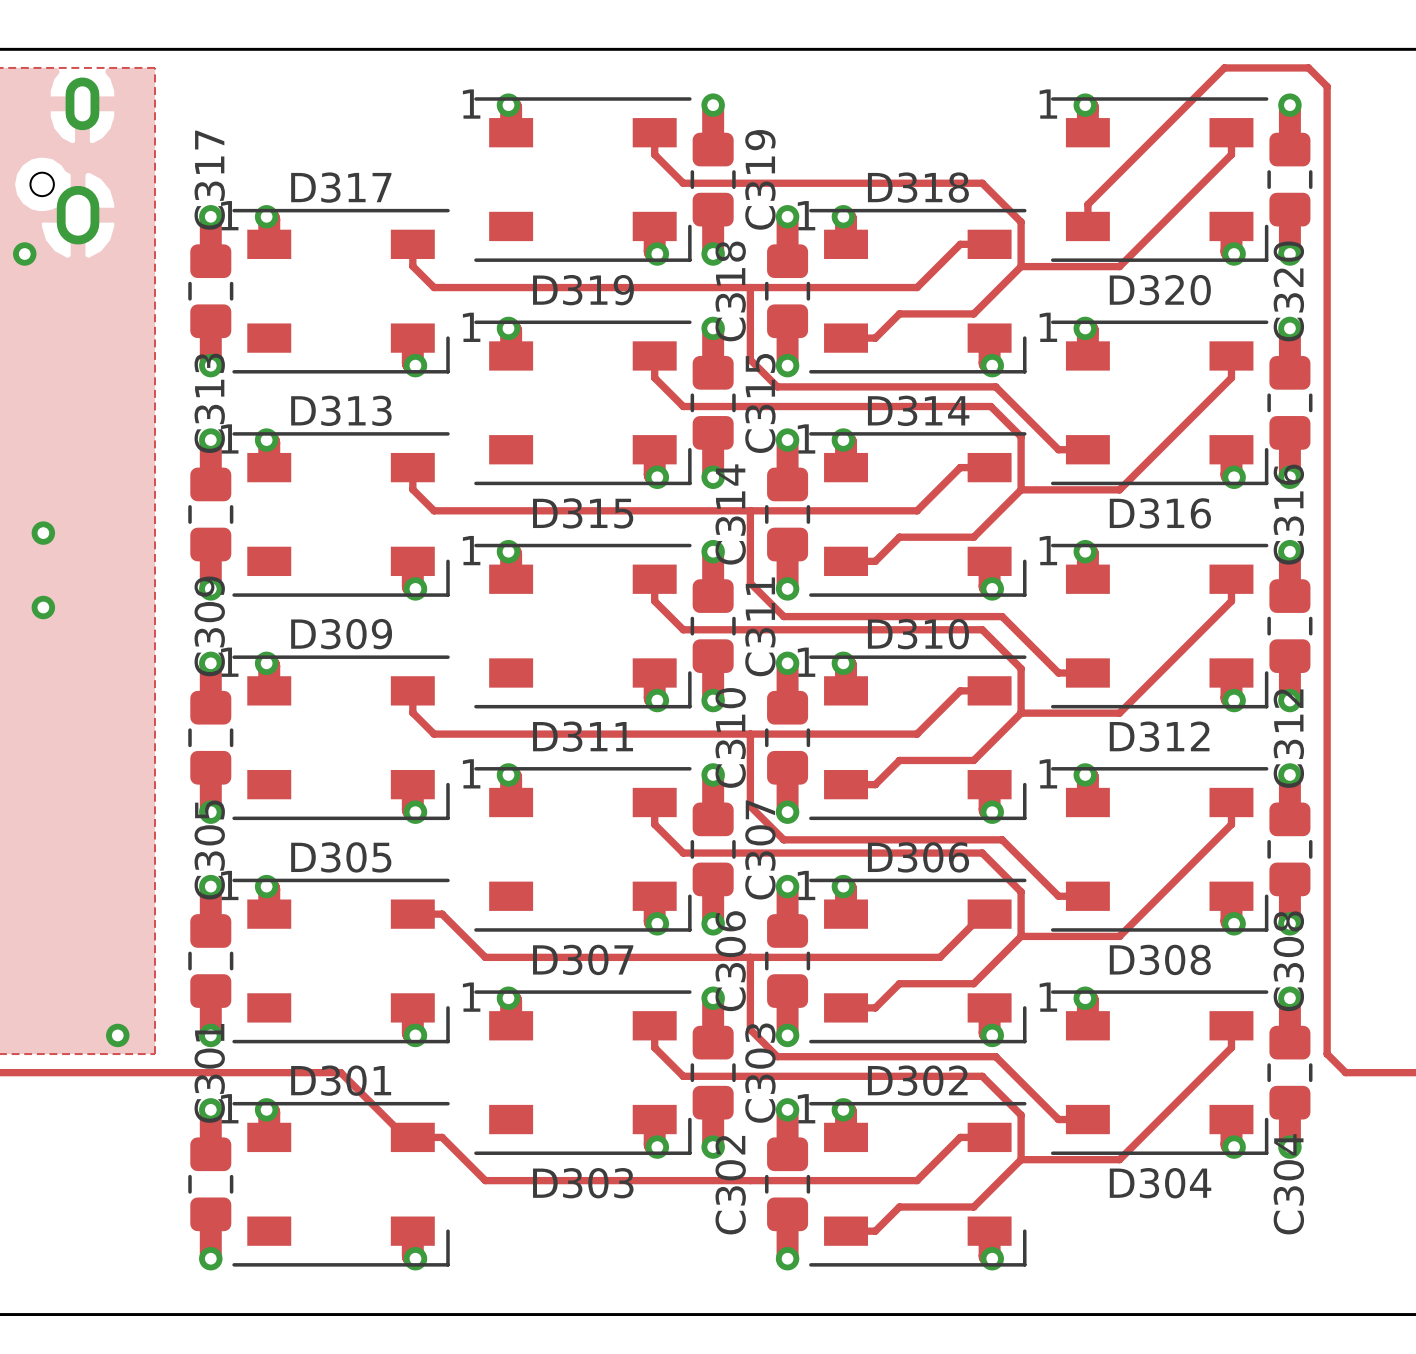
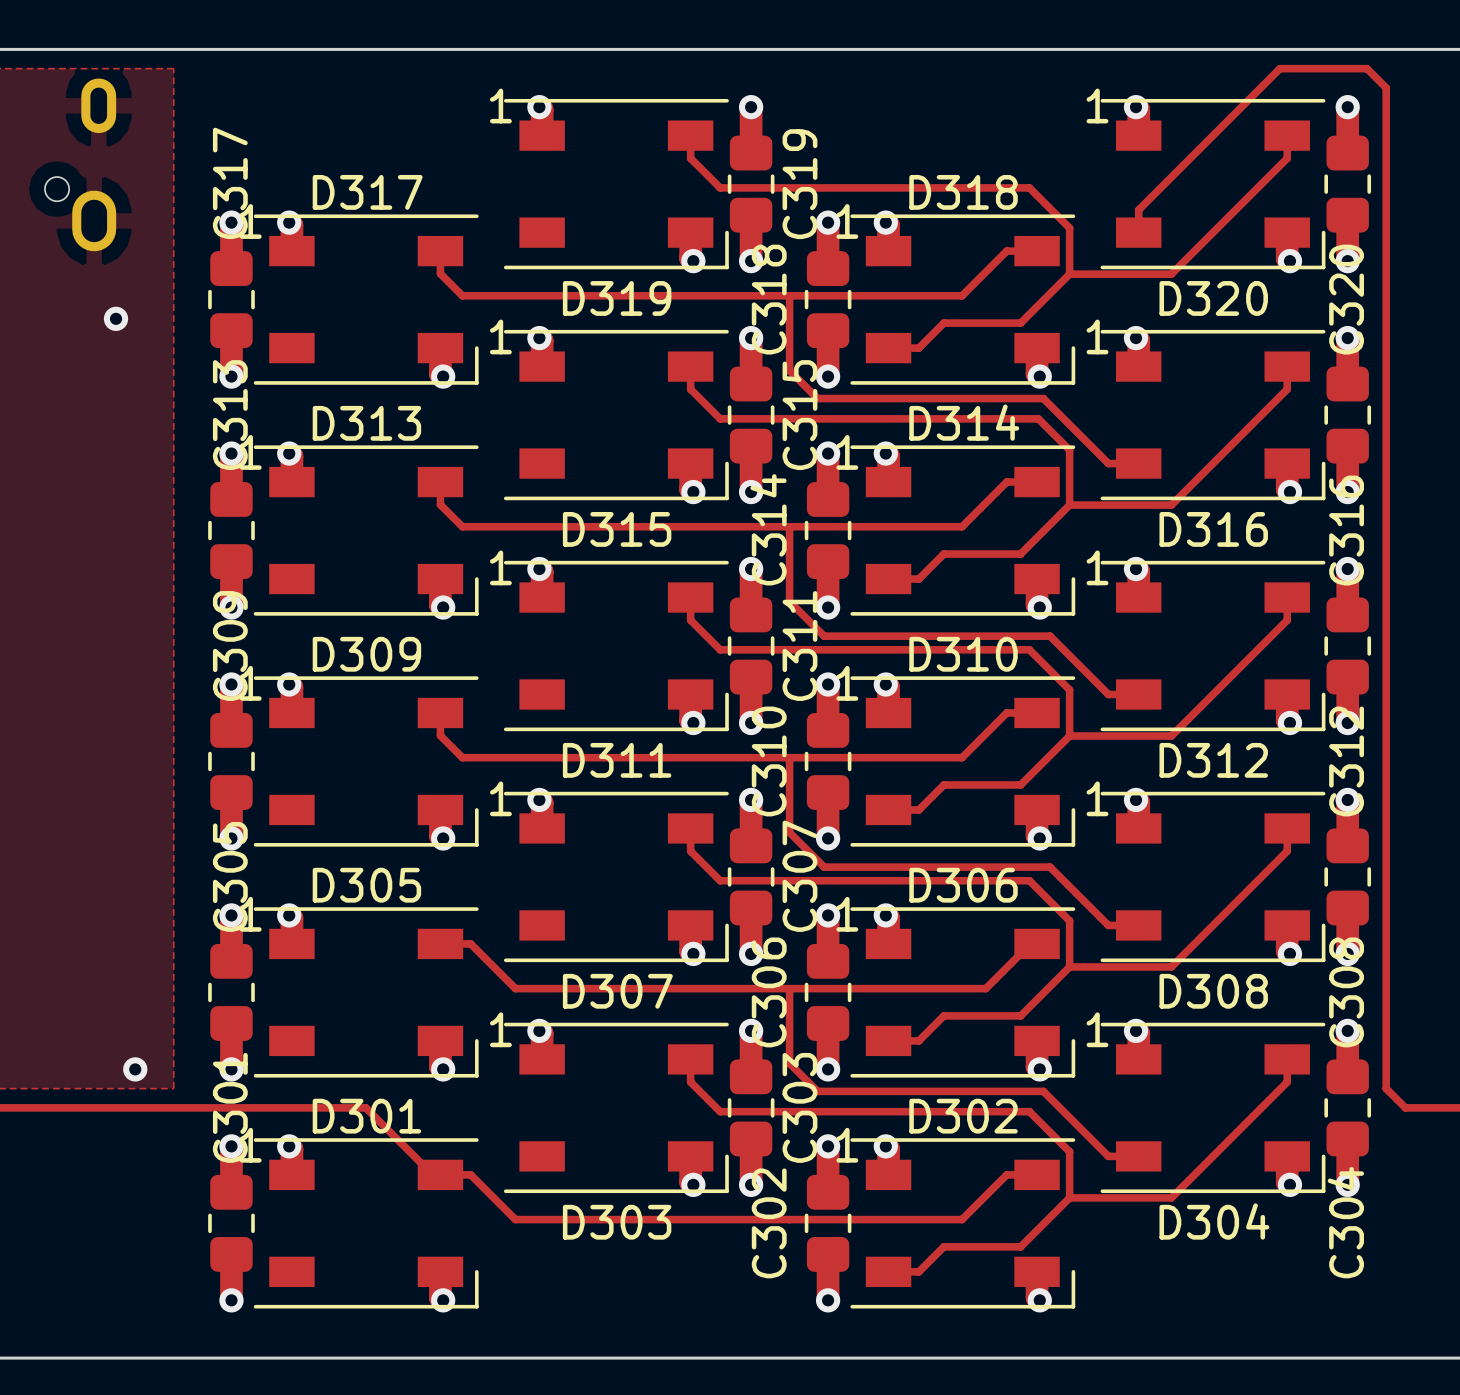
via position: (24, 254) -> (116, 318)
via: (43, 533) -> none
via: (43, 607) -> none

